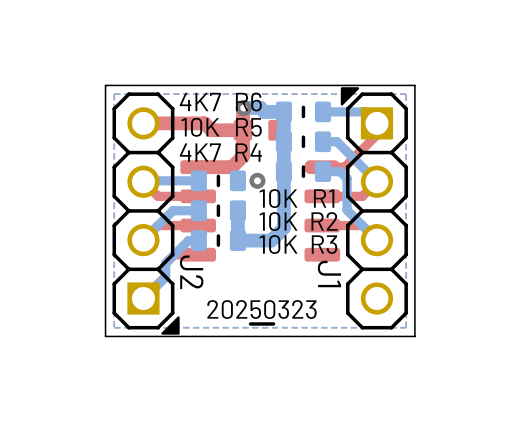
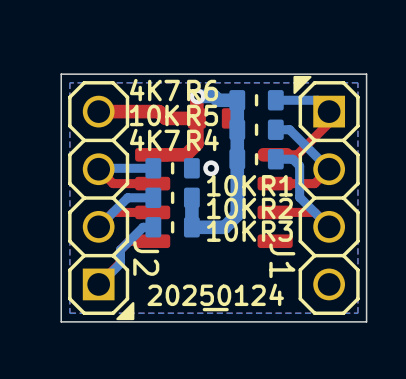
drawing shape: [207, 300, 317, 326] -> [147, 283, 284, 312]

